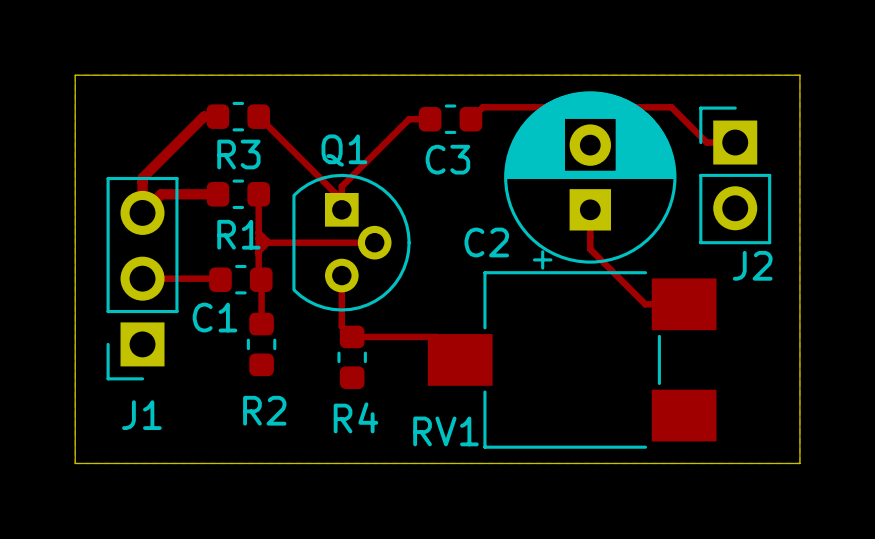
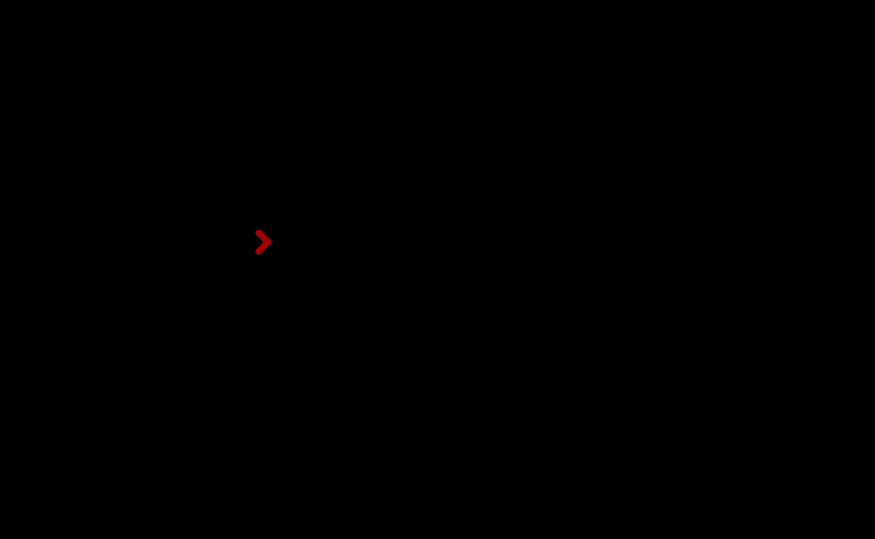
board edge: (75, 75) (75, 463) (799, 463) (799, 75) (75, 75) -> none
top track: (217, 116) (203, 116) (142, 178) (142, 212) (161, 194) (217, 194) -> none
R3: (238, 116) -> none
top track: (258, 116) (341, 199) -> none
top track: (430, 119) (409, 119) (341, 186) (341, 209) -> none
C3: (450, 119) -> none
top track: (470, 119) (482, 107) (671, 107) (706, 142) (735, 142) -> none
J2: (735, 175) -> none
C2: (590, 180) -> none
R1: (238, 194) -> none
top track: (258, 194) (258, 277) (261, 280) (261, 324) -> none
top track: (590, 209) (590, 249) (645, 304) (684, 304) -> none
top track: (258, 238) (262, 242) (374, 242) -> none
Q1: (351, 242) -> none
top track: (341, 275) (341, 326) (352, 336) (437, 336) (460, 359) -> none
top track: (142, 278) (220, 279) -> none
J1: (142, 278) -> none
C1: (240, 279) -> none
R2: (261, 344) -> none
R4: (352, 357) -> none
RV1: (572, 359) -> none

